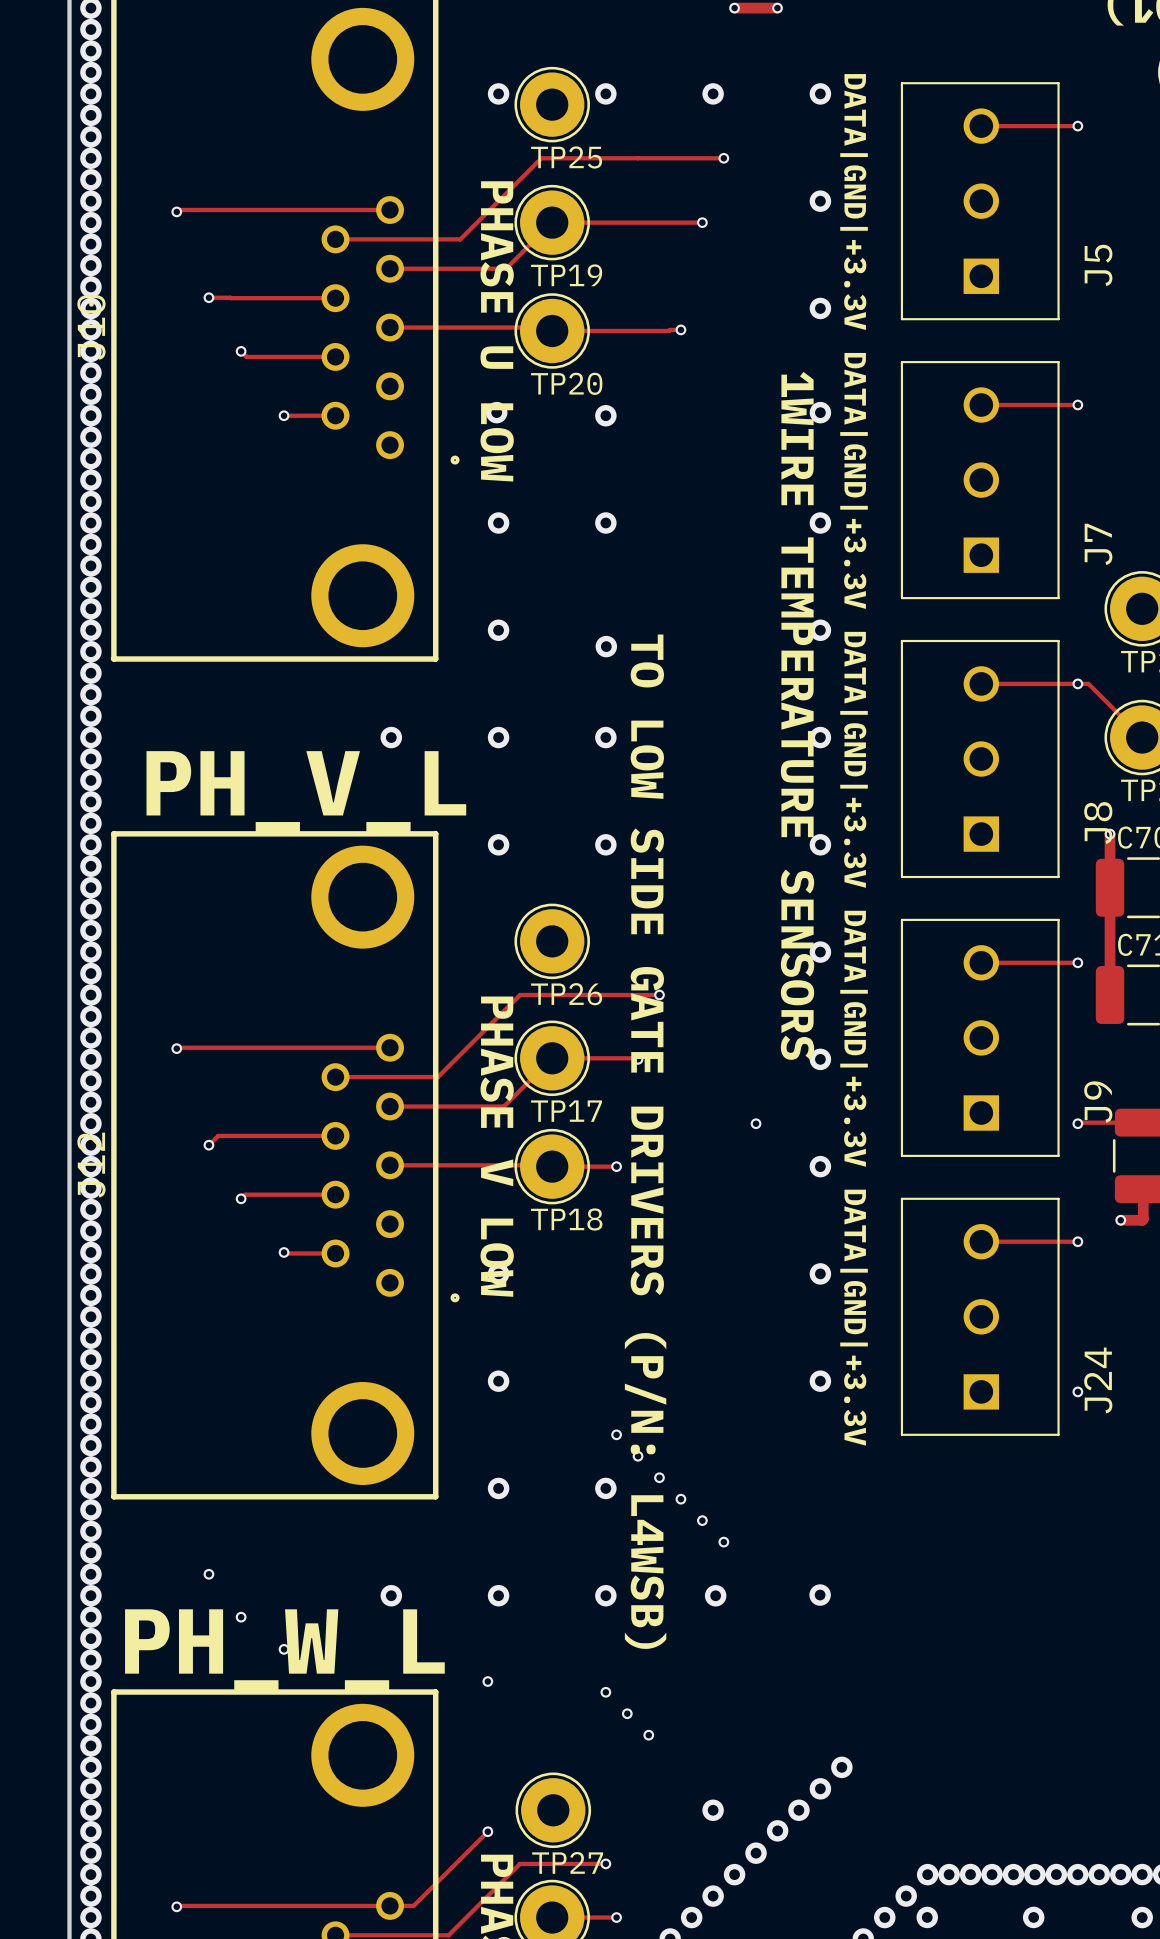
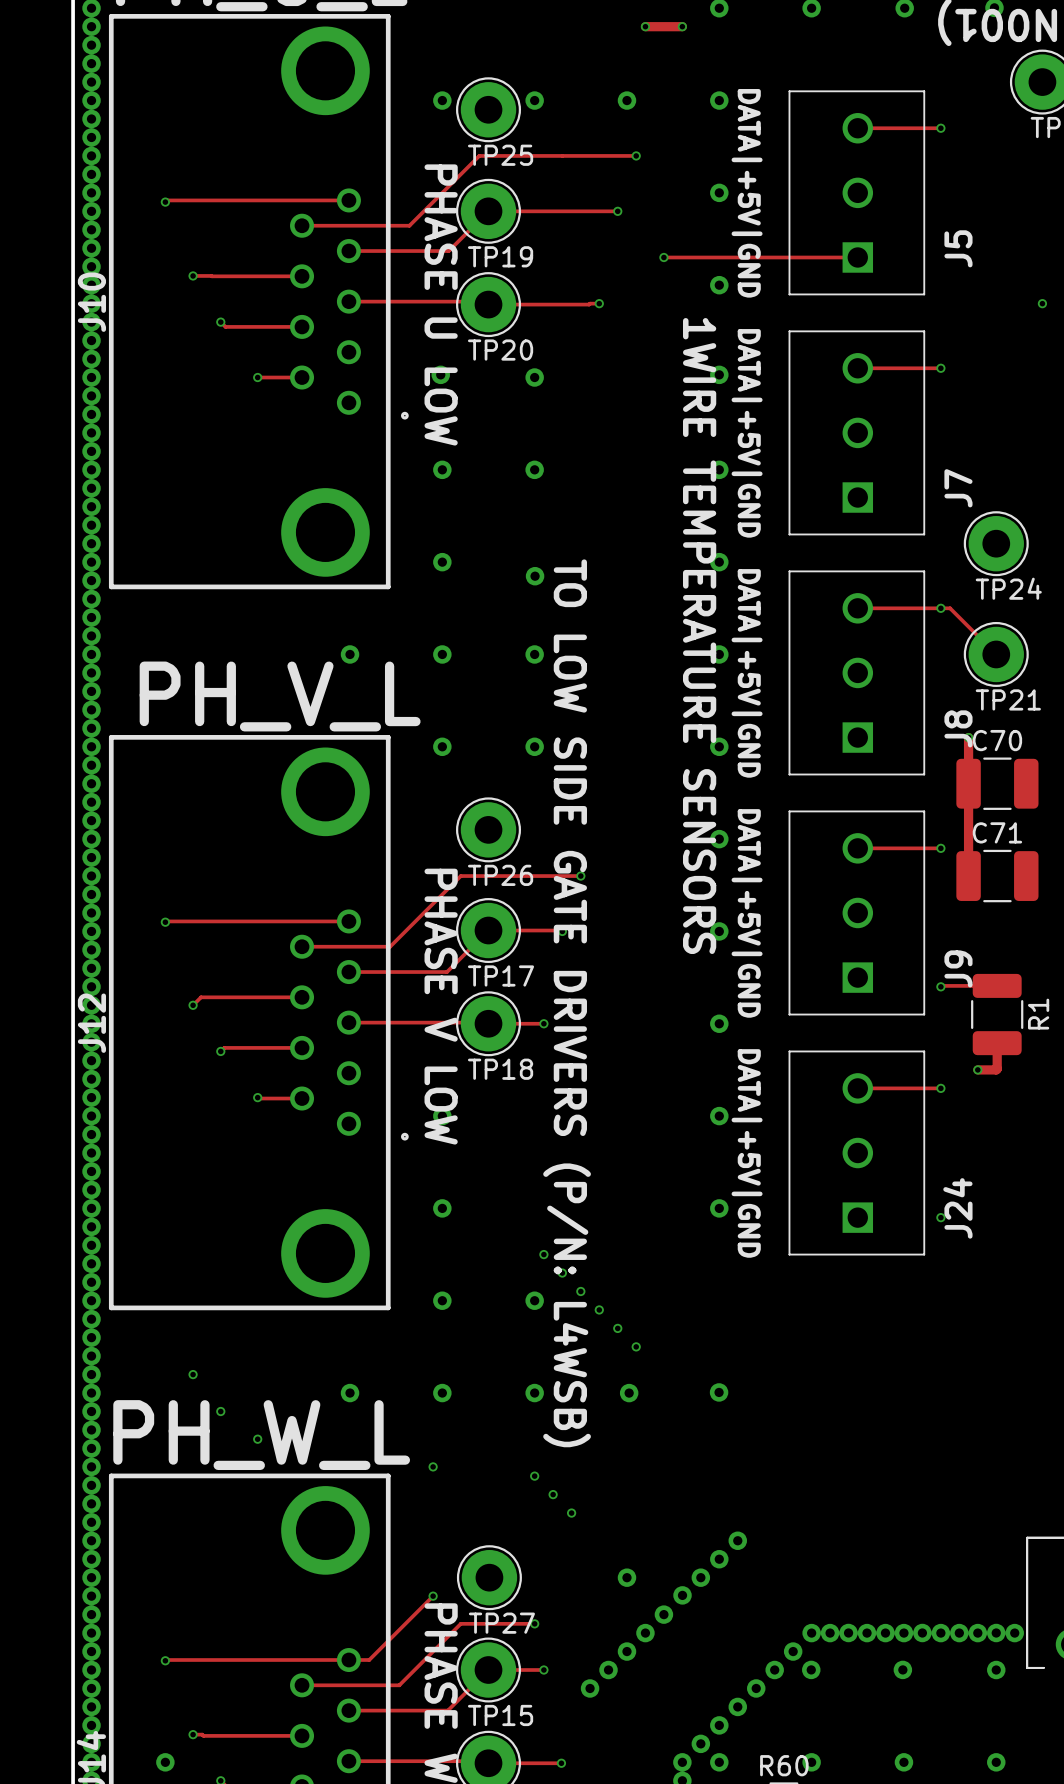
text: DATA|GND|+3.3V (854, 202) -> DATA|+5V|GND (747, 193)
track: none -> (663, 257) (857, 257)
via: none -> (663, 257)
text: DATA|GND|+3.3V (854, 480) -> DATA|+5V|GND (747, 433)
text: DATA|GND|+3.3V (854, 759) -> DATA|+5V|GND (747, 673)
text: DATA|GND|+3.3V (854, 1038) -> DATA|+5V|GND (747, 913)
via: (756, 1123) -> none
text: DATA|GND|+3.3V (854, 1317) -> DATA|+5V|GND (747, 1153)

